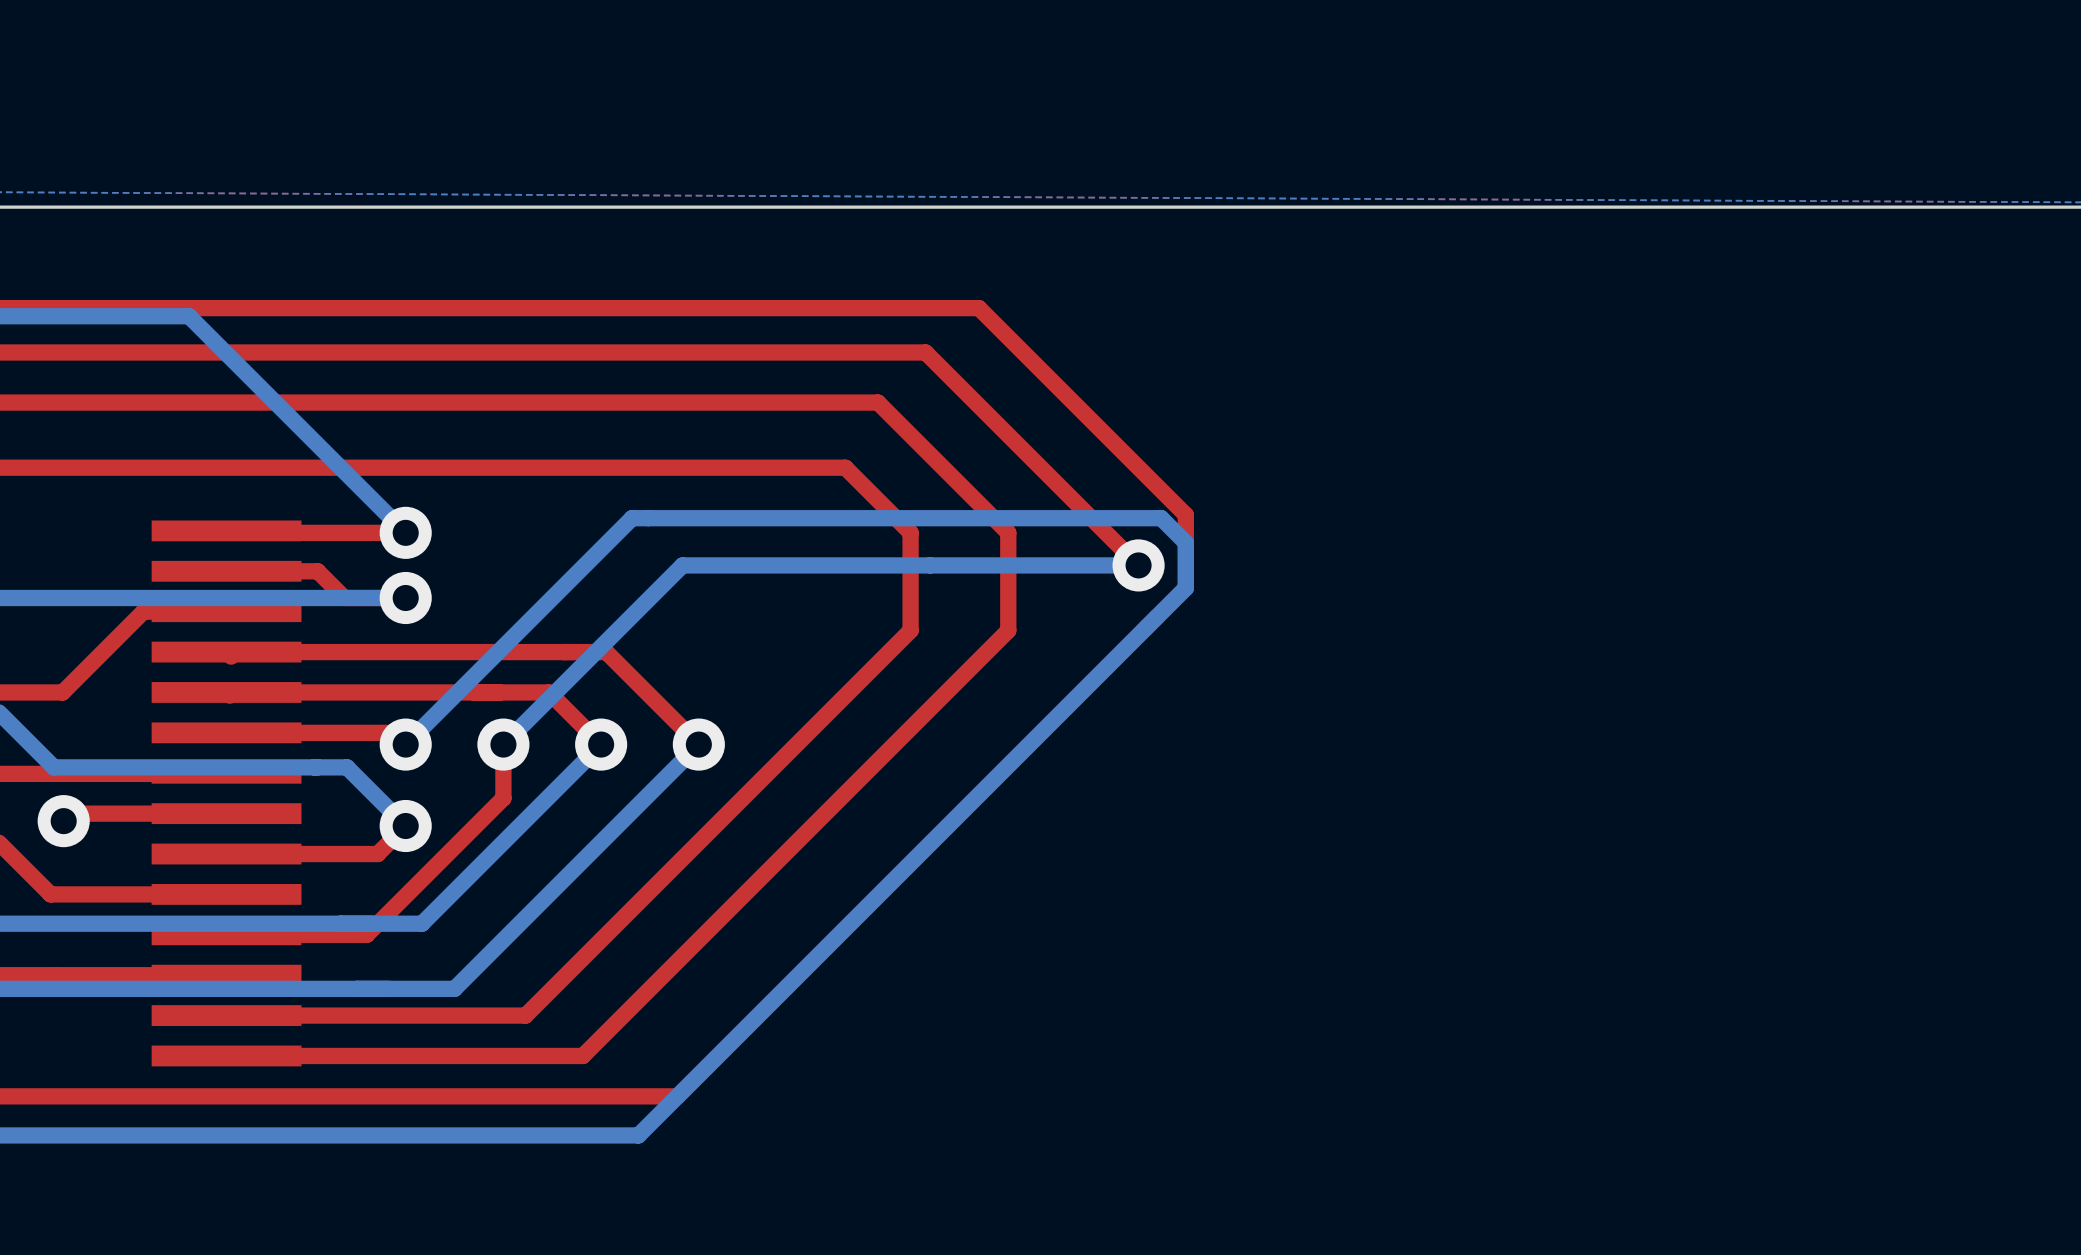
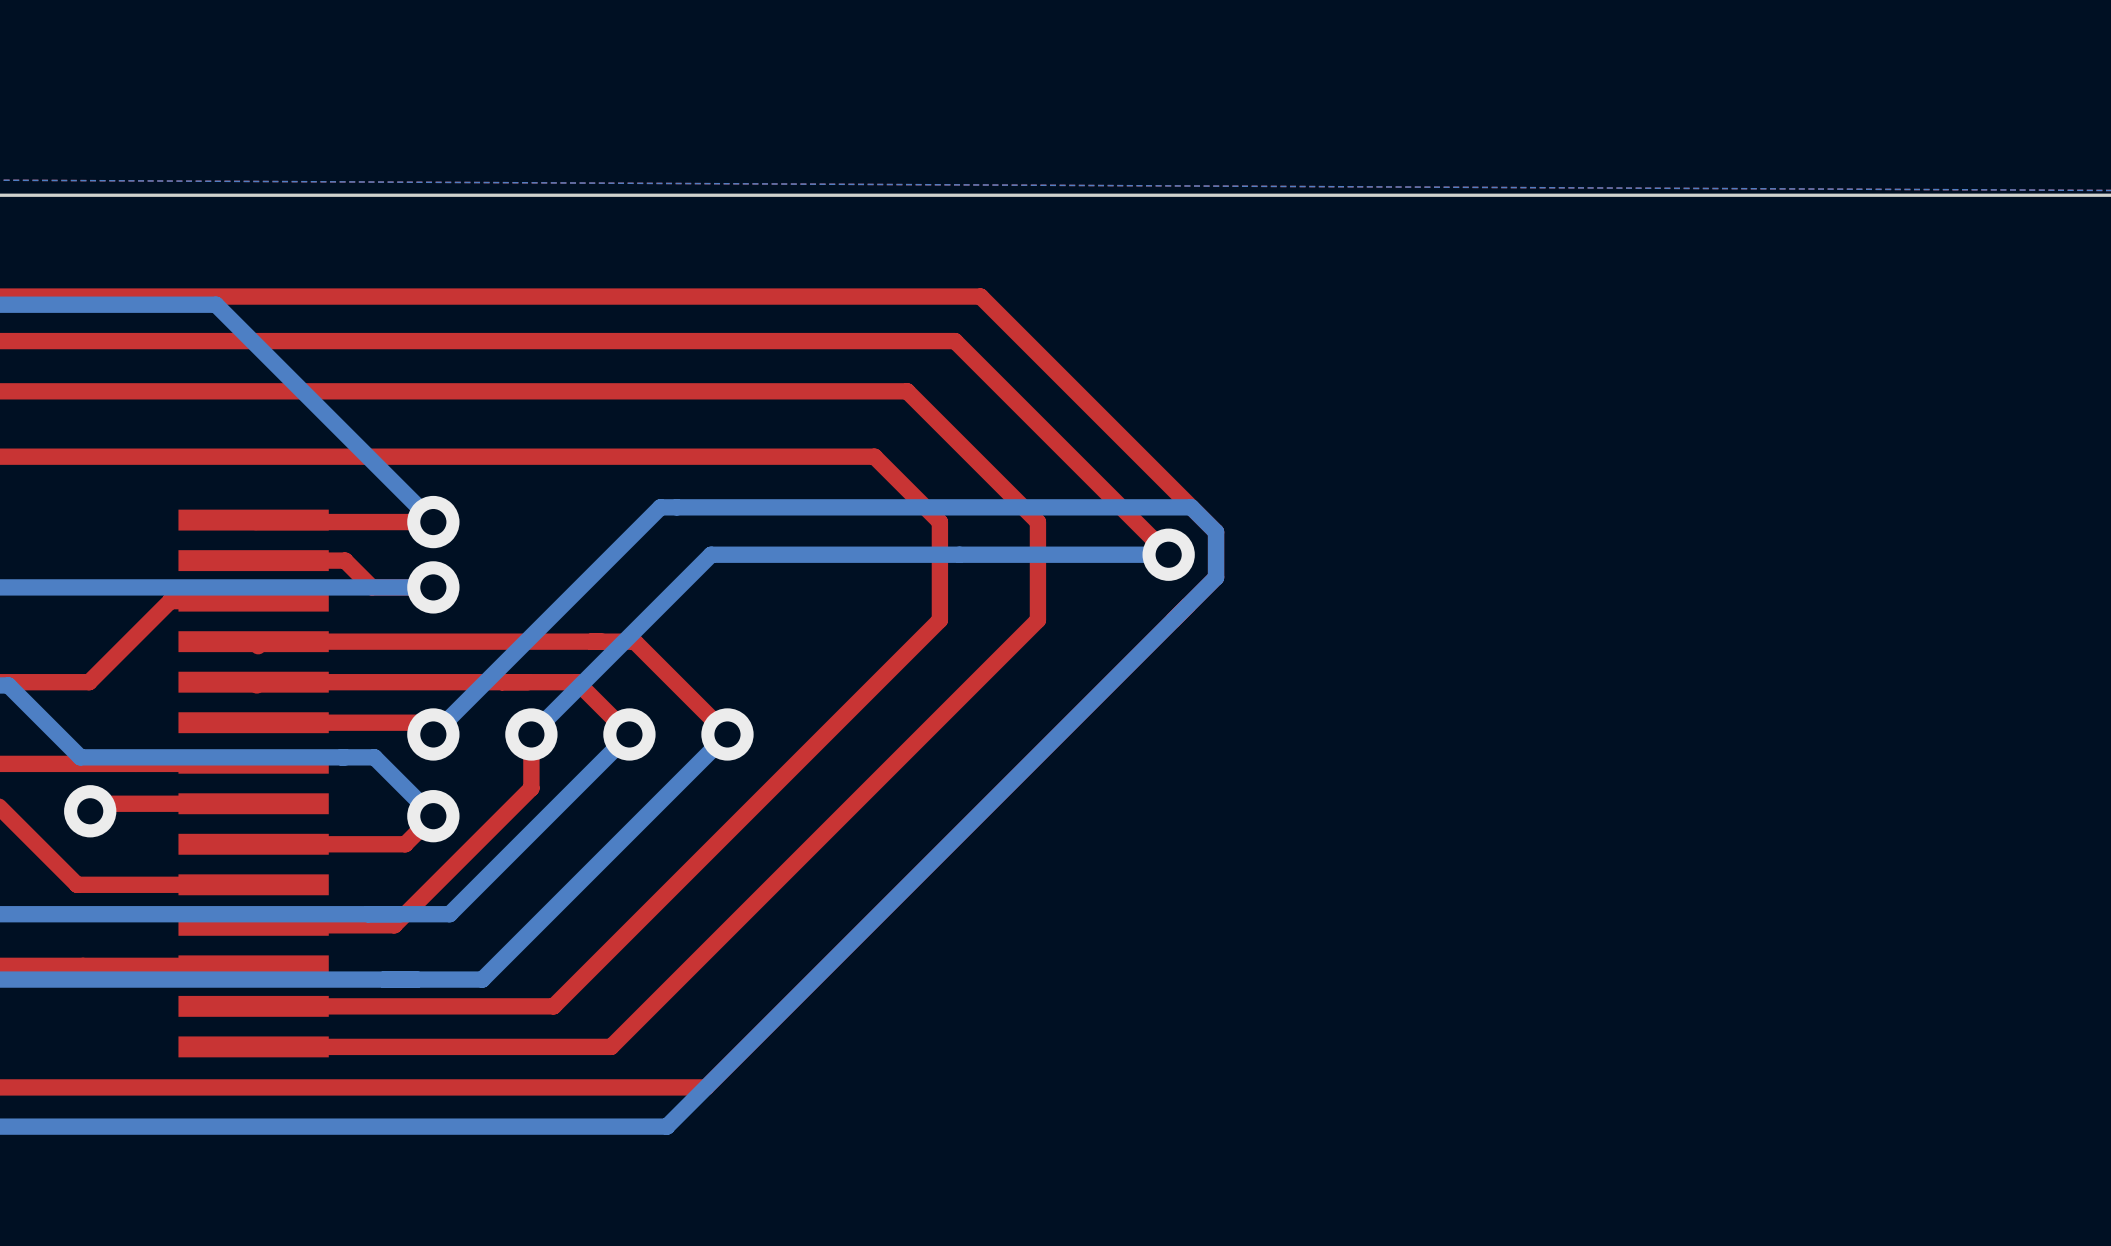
top track: (951, 308) (978, 308) (1185, 514) (1185, 542) -> (980, 296) (1216, 531)

